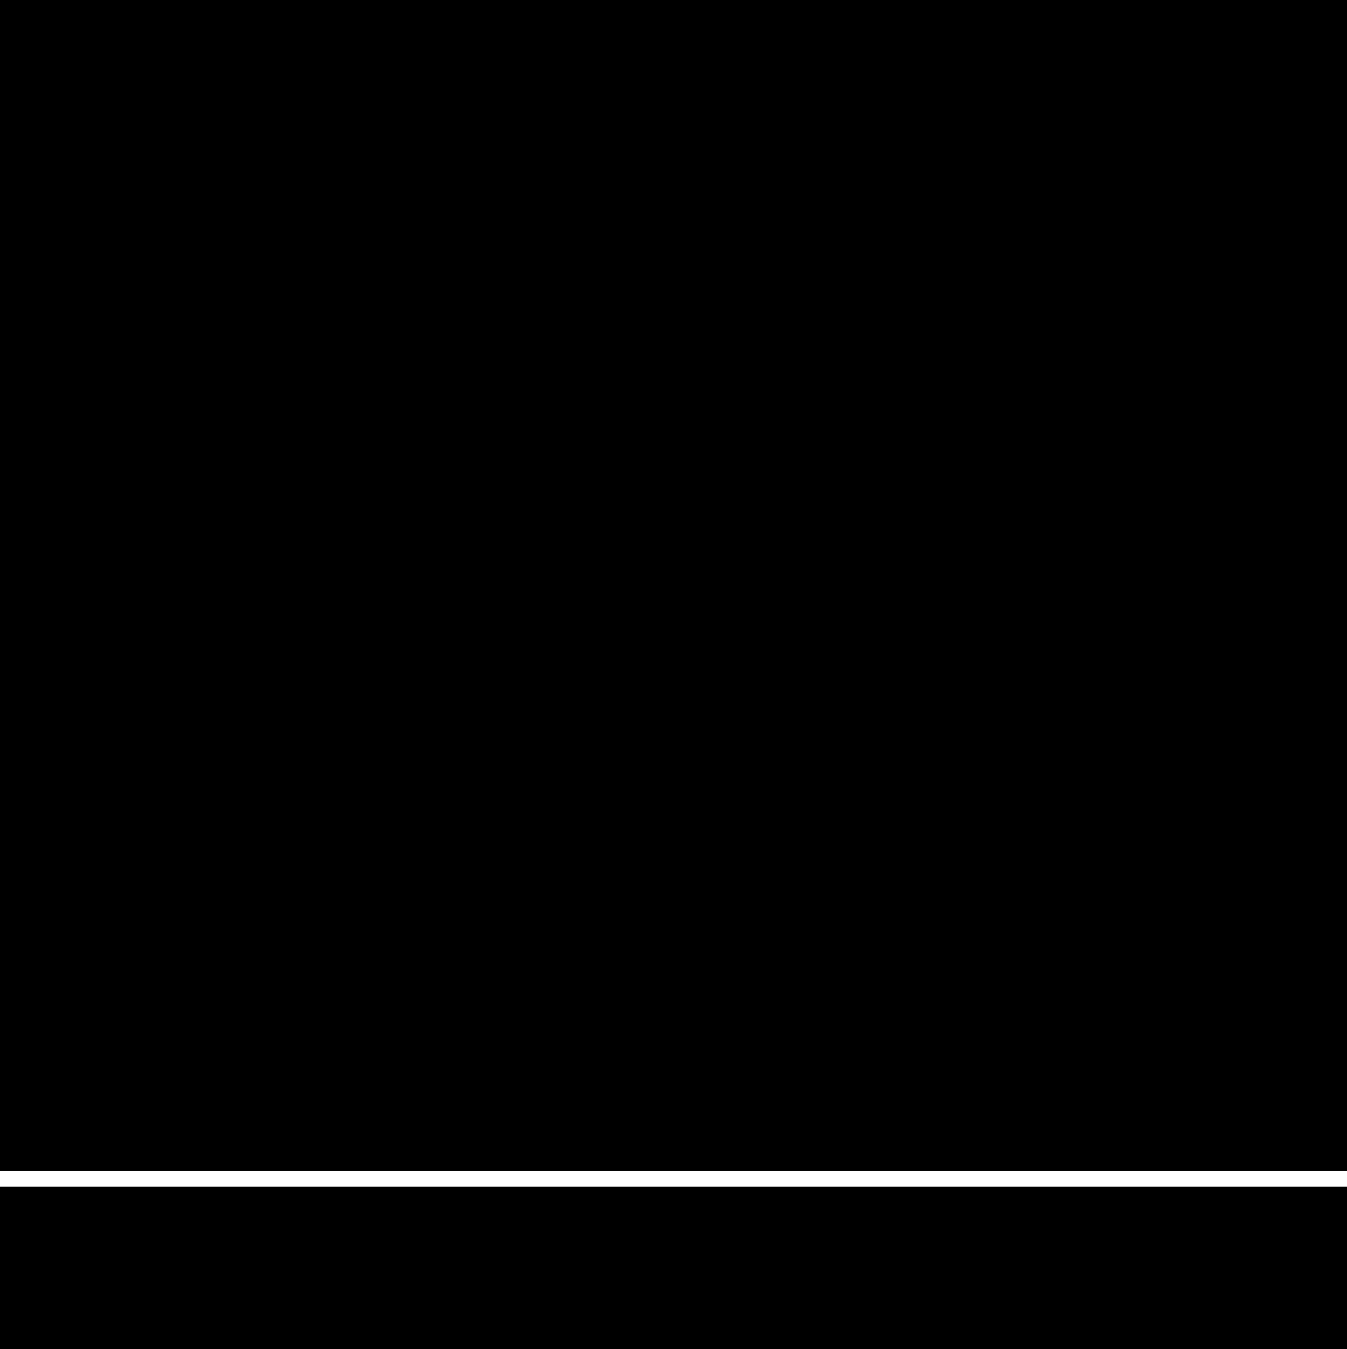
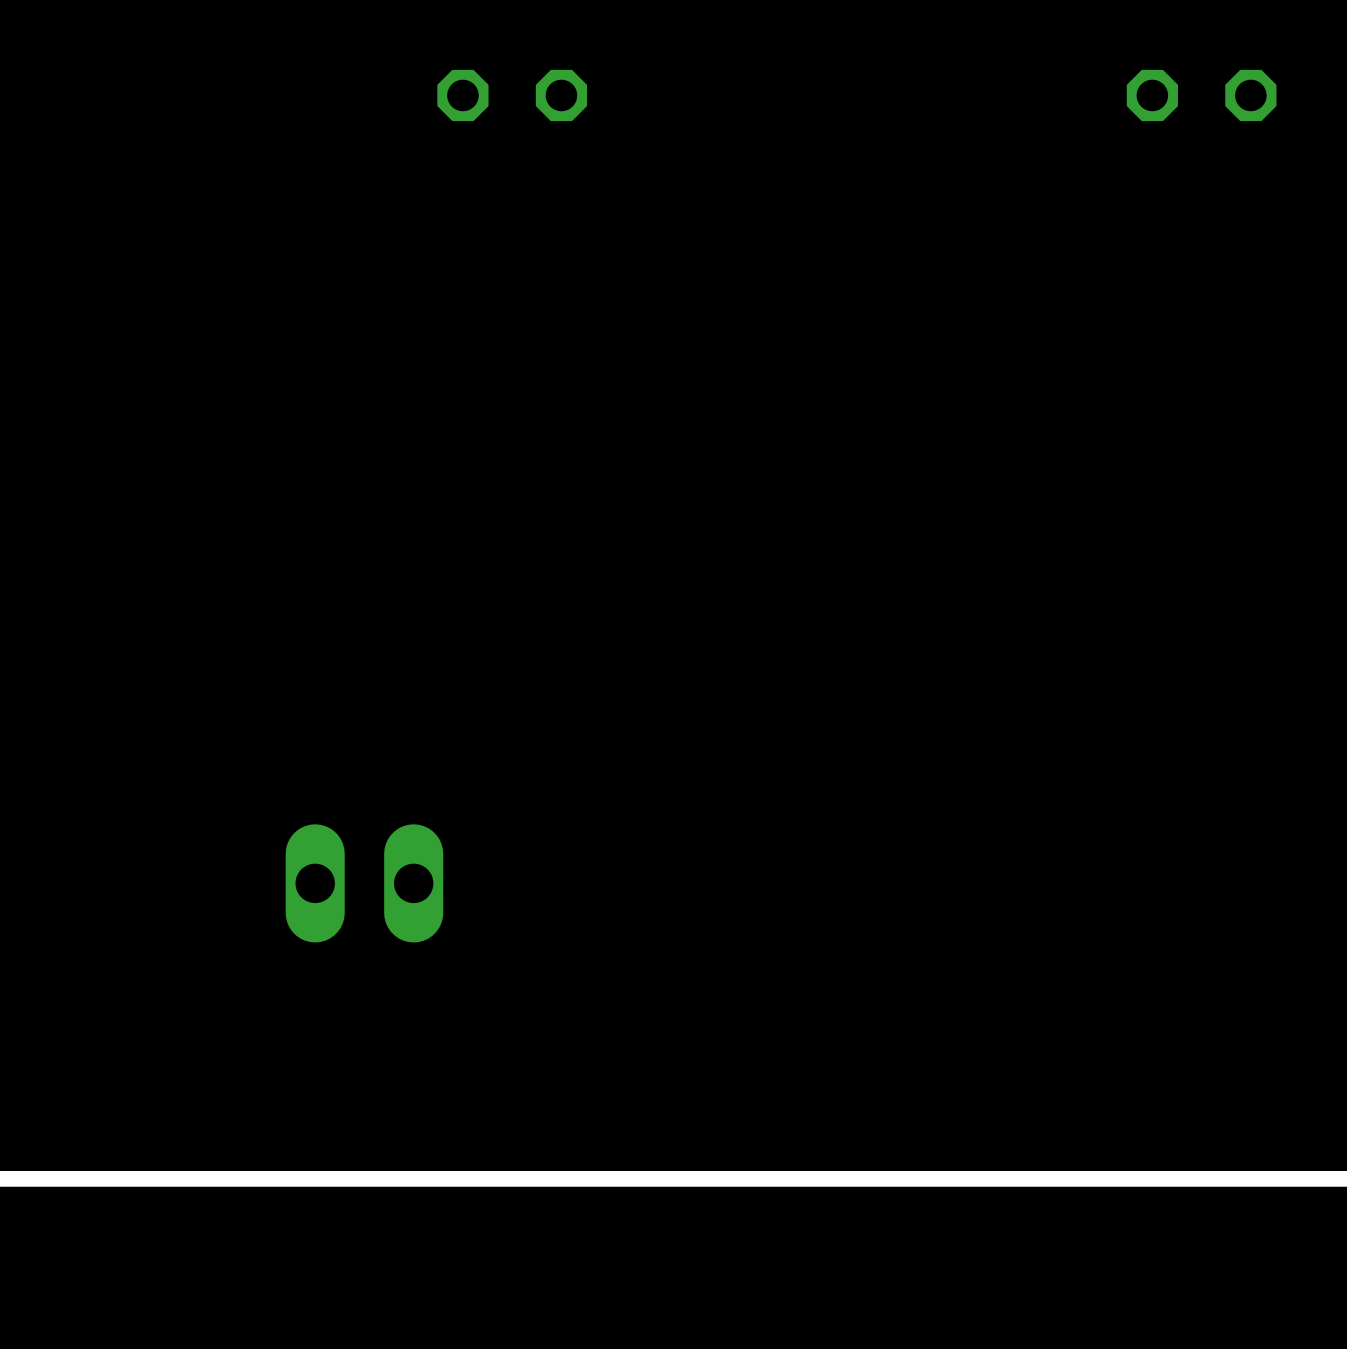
part: none -> (512, 95)
part: none -> (1201, 95)
part: none -> (364, 883)

